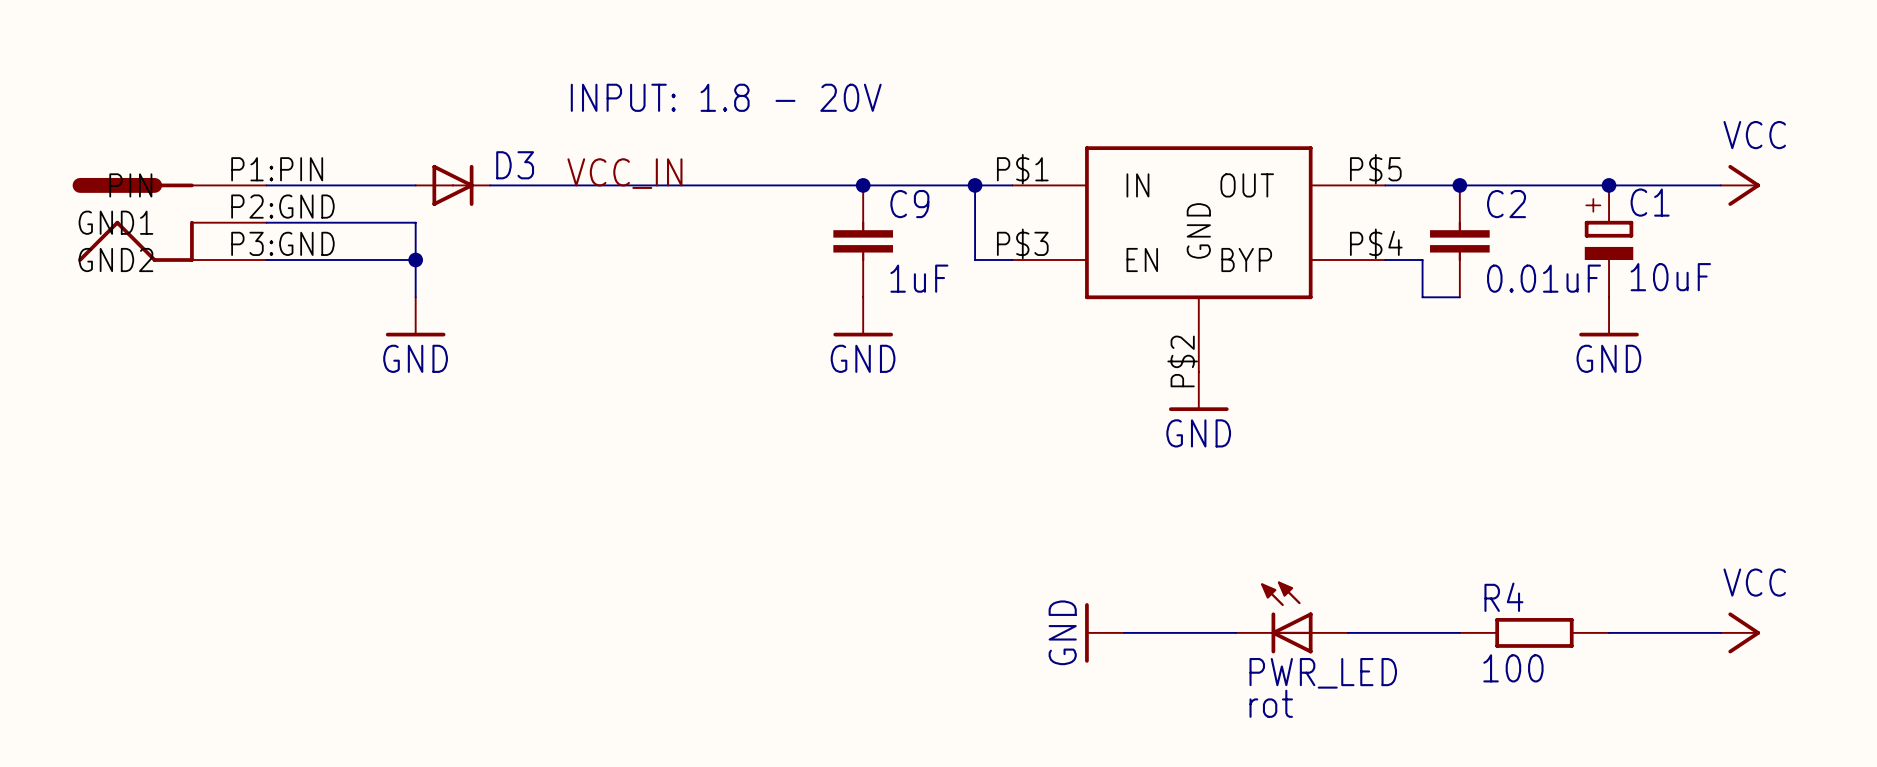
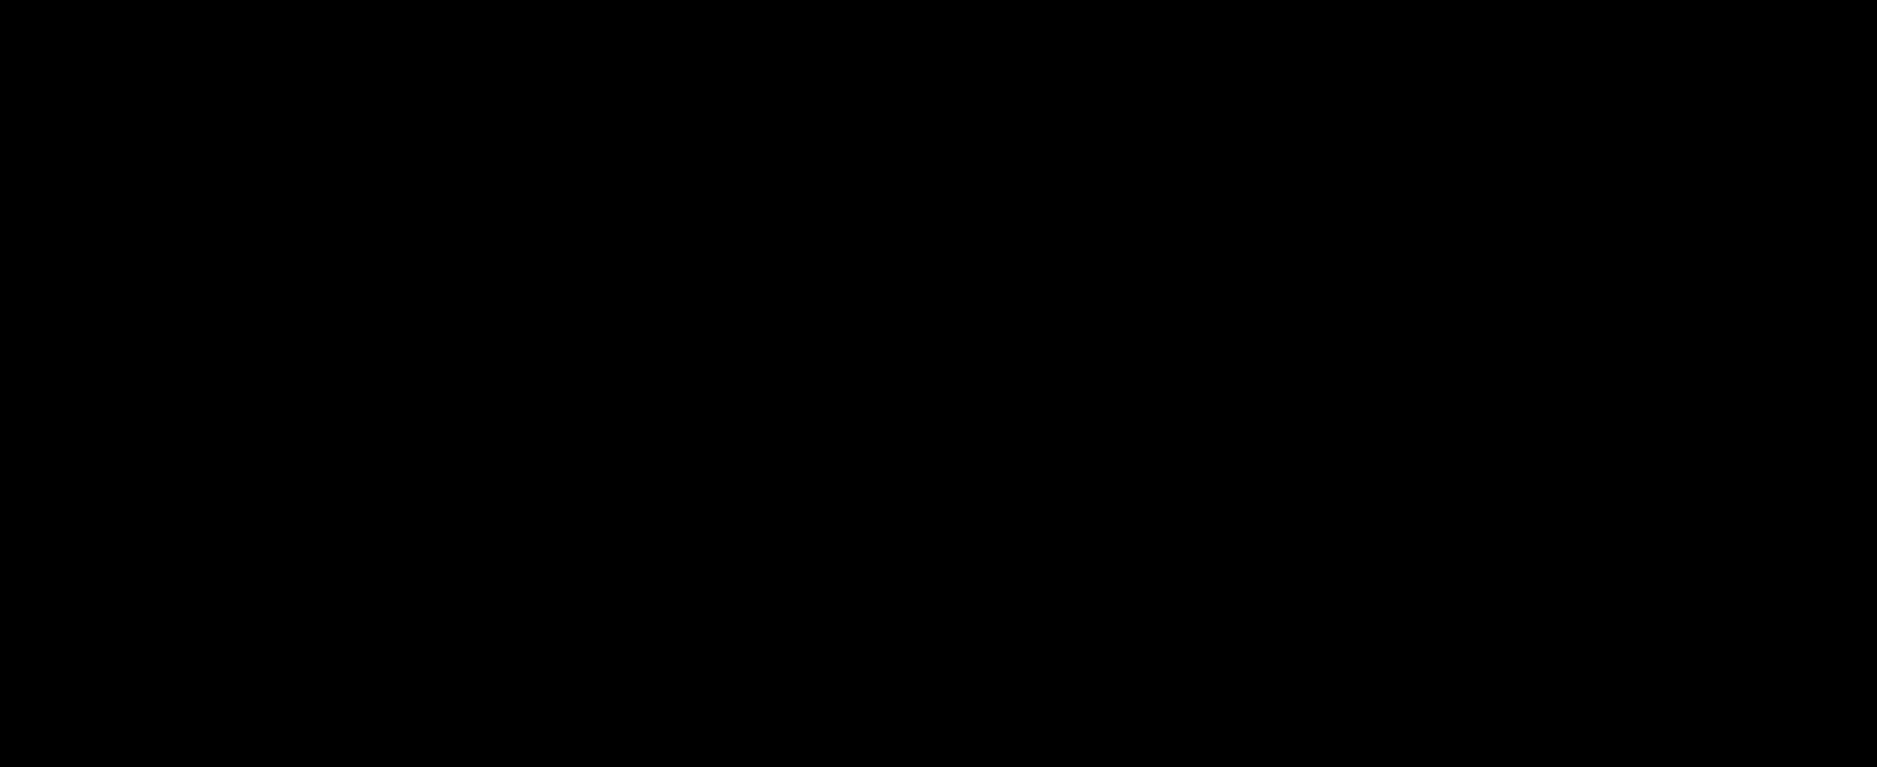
text: INPUT: 1.8 - 20V (726, 97) -> none
label: VCC_IN (624, 173) -> none
wire: (266, 185) (415, 185) -> none
D3: (452, 185) -> none
wire: (490, 185) (1012, 185) -> none
junction: (863, 185) -> none
wire: (975, 185) (975, 260) (1012, 260) -> none
junction: (975, 185) -> none
wire: (1385, 185) (1720, 185) -> none
junction: (1459, 185) -> none
junction: (1609, 185) -> none
power symbol: VCC (1740, 185) -> none
part: (169, 219) -> none
wire: (266, 222) (415, 222) (415, 297) -> none
C9: 1uF (863, 241) -> none
C2: 0.01uF (1459, 241) -> none
C1: 10uF (1609, 241) -> none
part: (1198, 259) -> none
wire: (266, 260) (415, 260) -> none
junction: (415, 260) -> none
wire: (1385, 260) (1422, 260) (1422, 297) (1459, 297) -> none
power symbol: GND (415, 316) -> none
power symbol: GND (863, 316) -> none
power symbol: GND (1609, 316) -> none
power symbol: GND (1198, 391) -> none
PWR_LED: rot (1292, 617) -> none
power symbol: GND (1104, 632) -> none
wire: (1124, 632) (1236, 632) -> none
wire: (1347, 632) (1459, 632) -> none
R4: 100 (1534, 632) -> none
wire: (1609, 632) (1720, 632) -> none
power symbol: VCC (1740, 632) -> none

